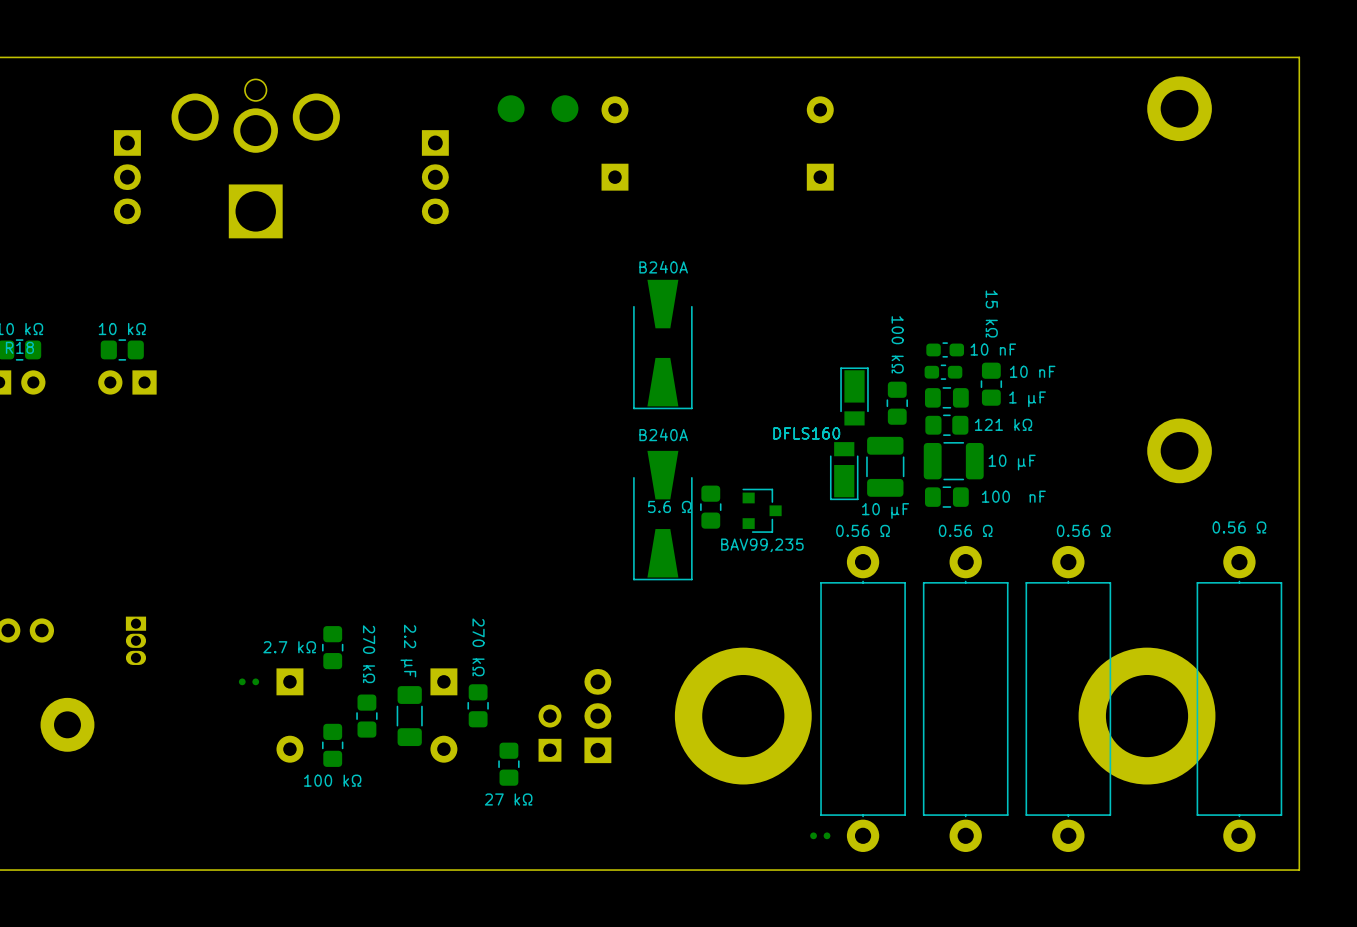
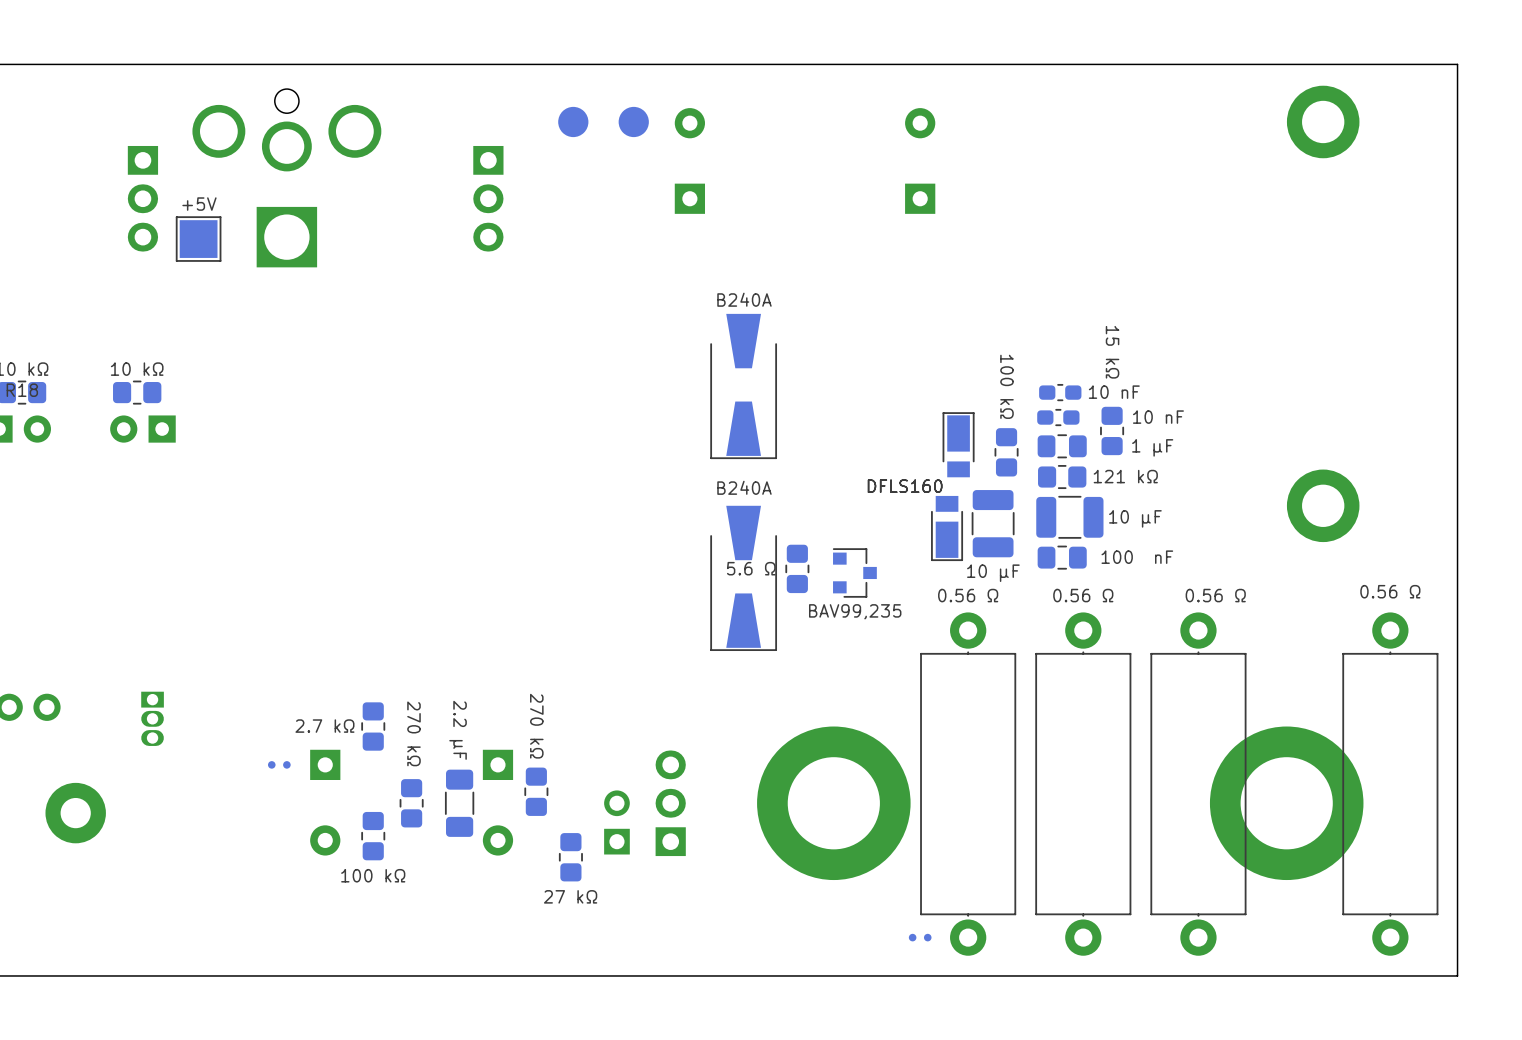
text: none -> +5V (199, 204)
part: none -> (198, 239)

